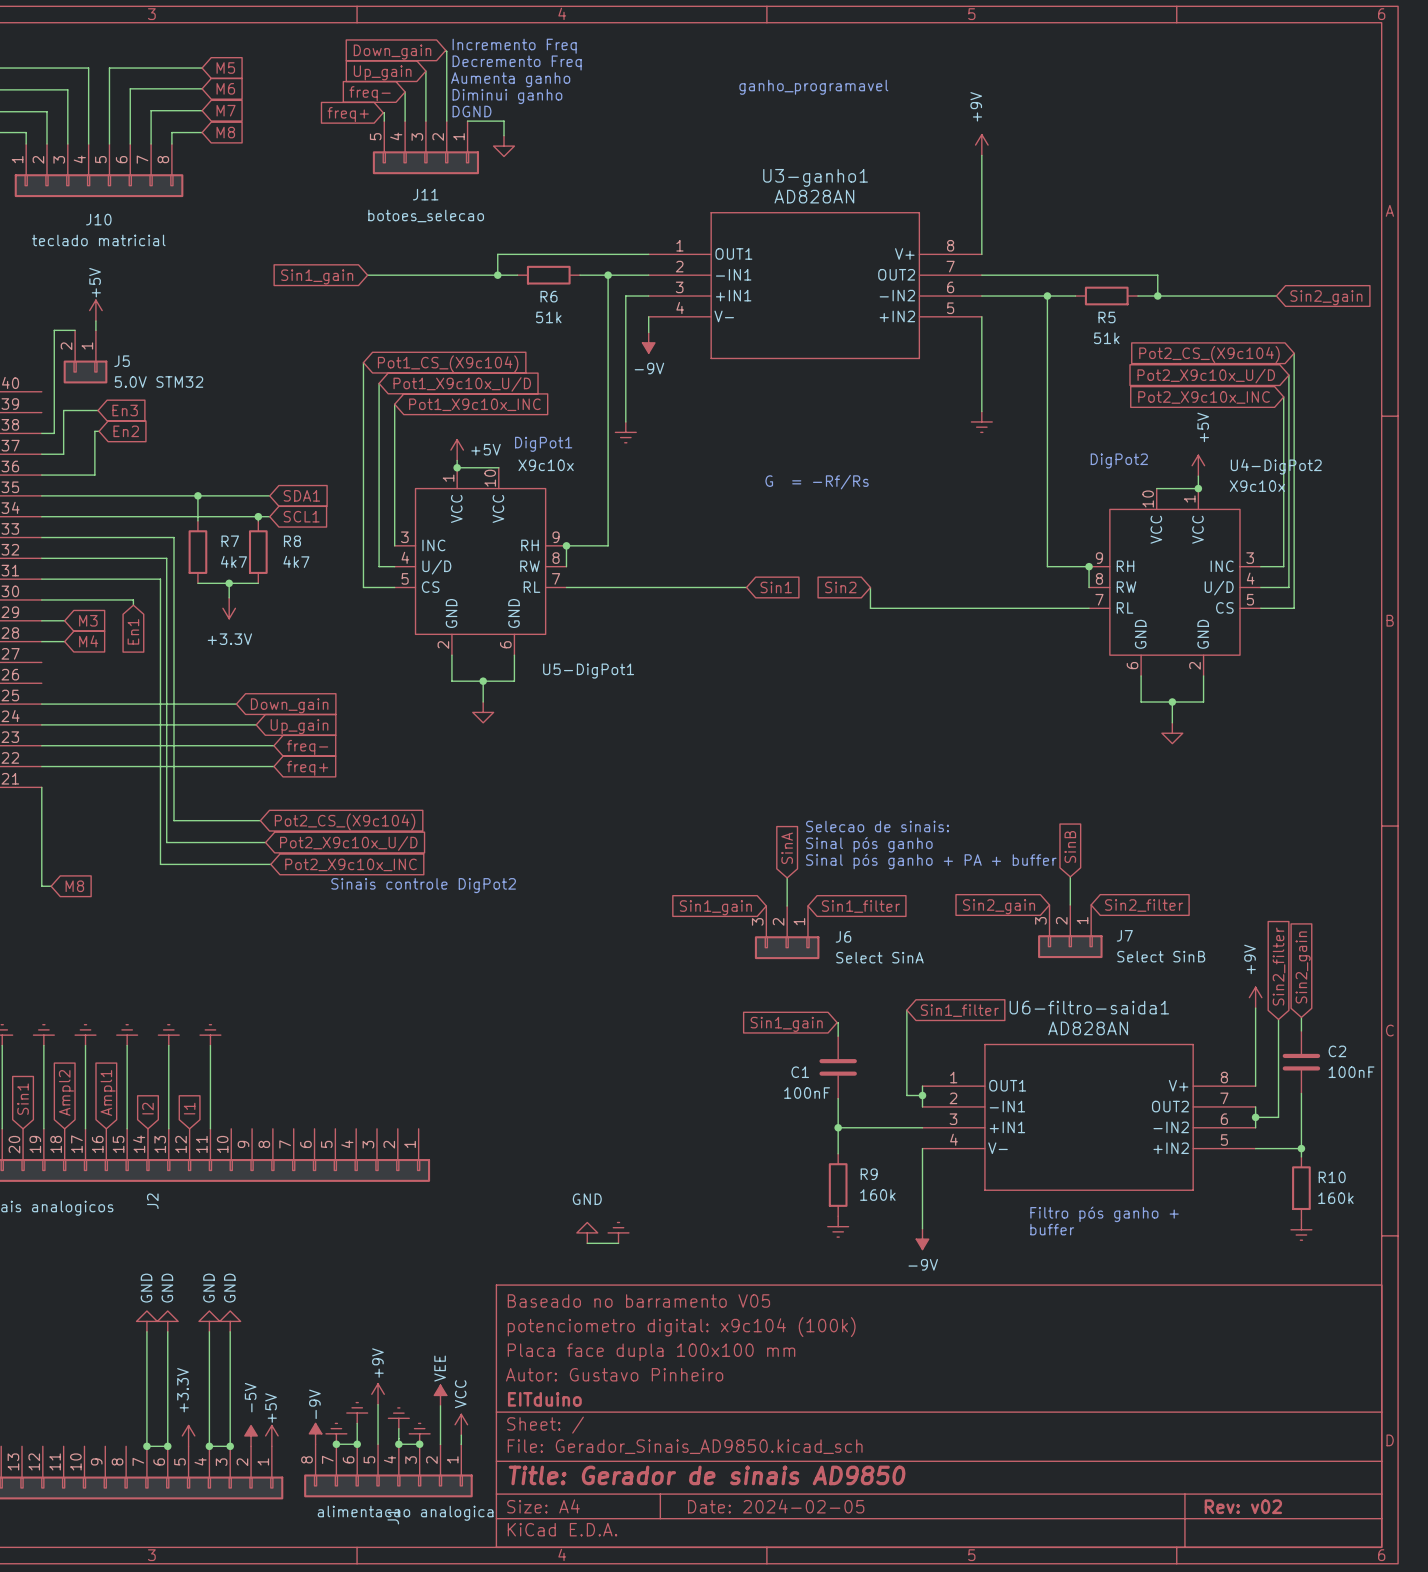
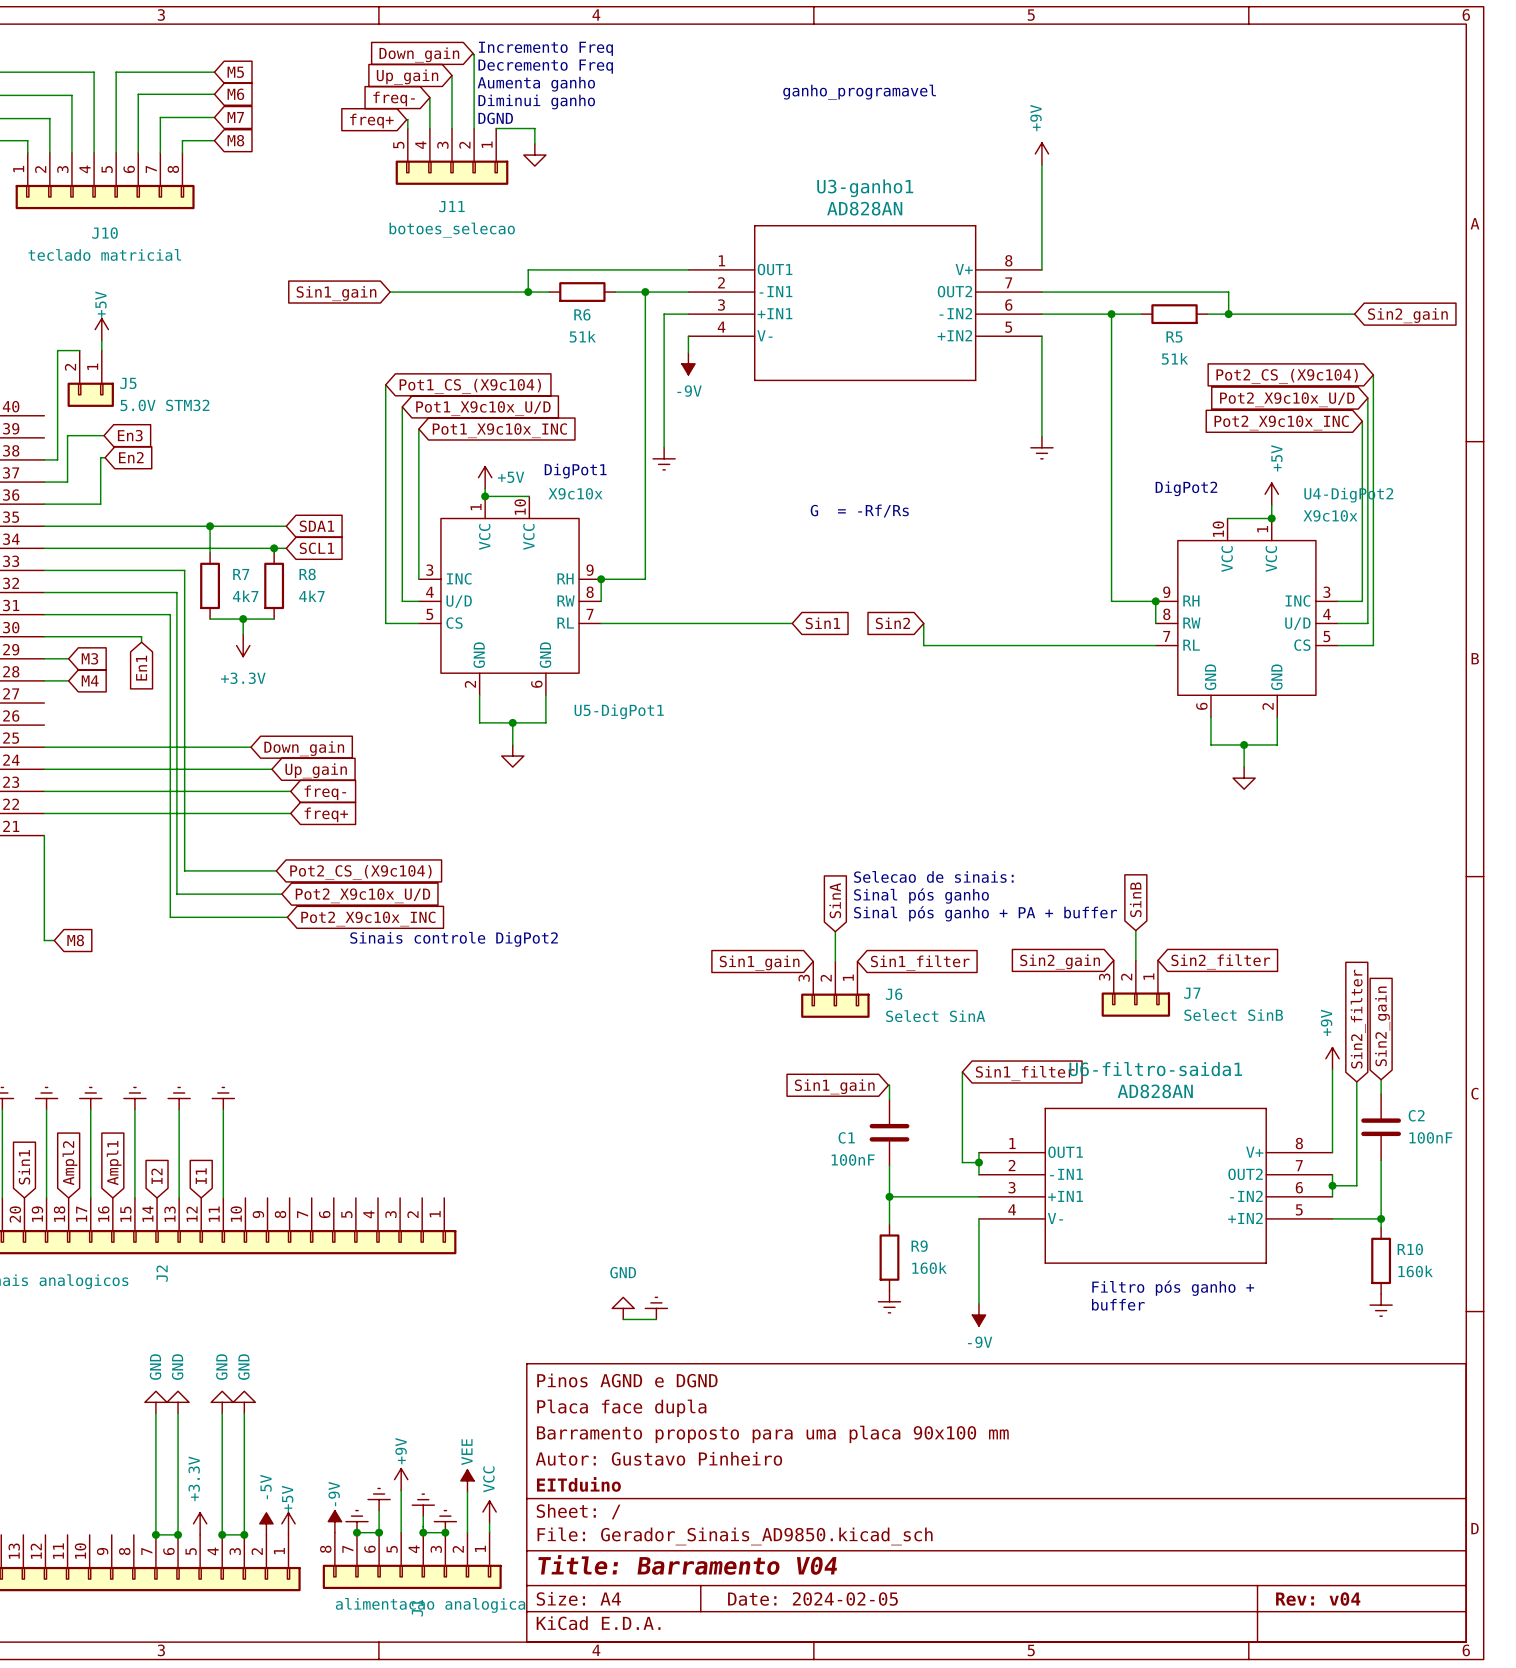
title block: Baseado no barramento V05 (638, 1300) -> Pinos AGND e DGND (627, 1380)
title block: potenciometro digital: x9c104 (100k) (681, 1327) -> Placa face dupla (621, 1408)
title block: Placa face dupla 100x100 mm (651, 1352) -> Barramento proposto para uma placa 90x100 mm (772, 1434)
title block: Title: Gerador de sinais AD9850 (707, 1475) -> Title: Barramento V04 (687, 1564)
title block: Rev: v02 (1243, 1506) -> Rev: v04 (1318, 1599)

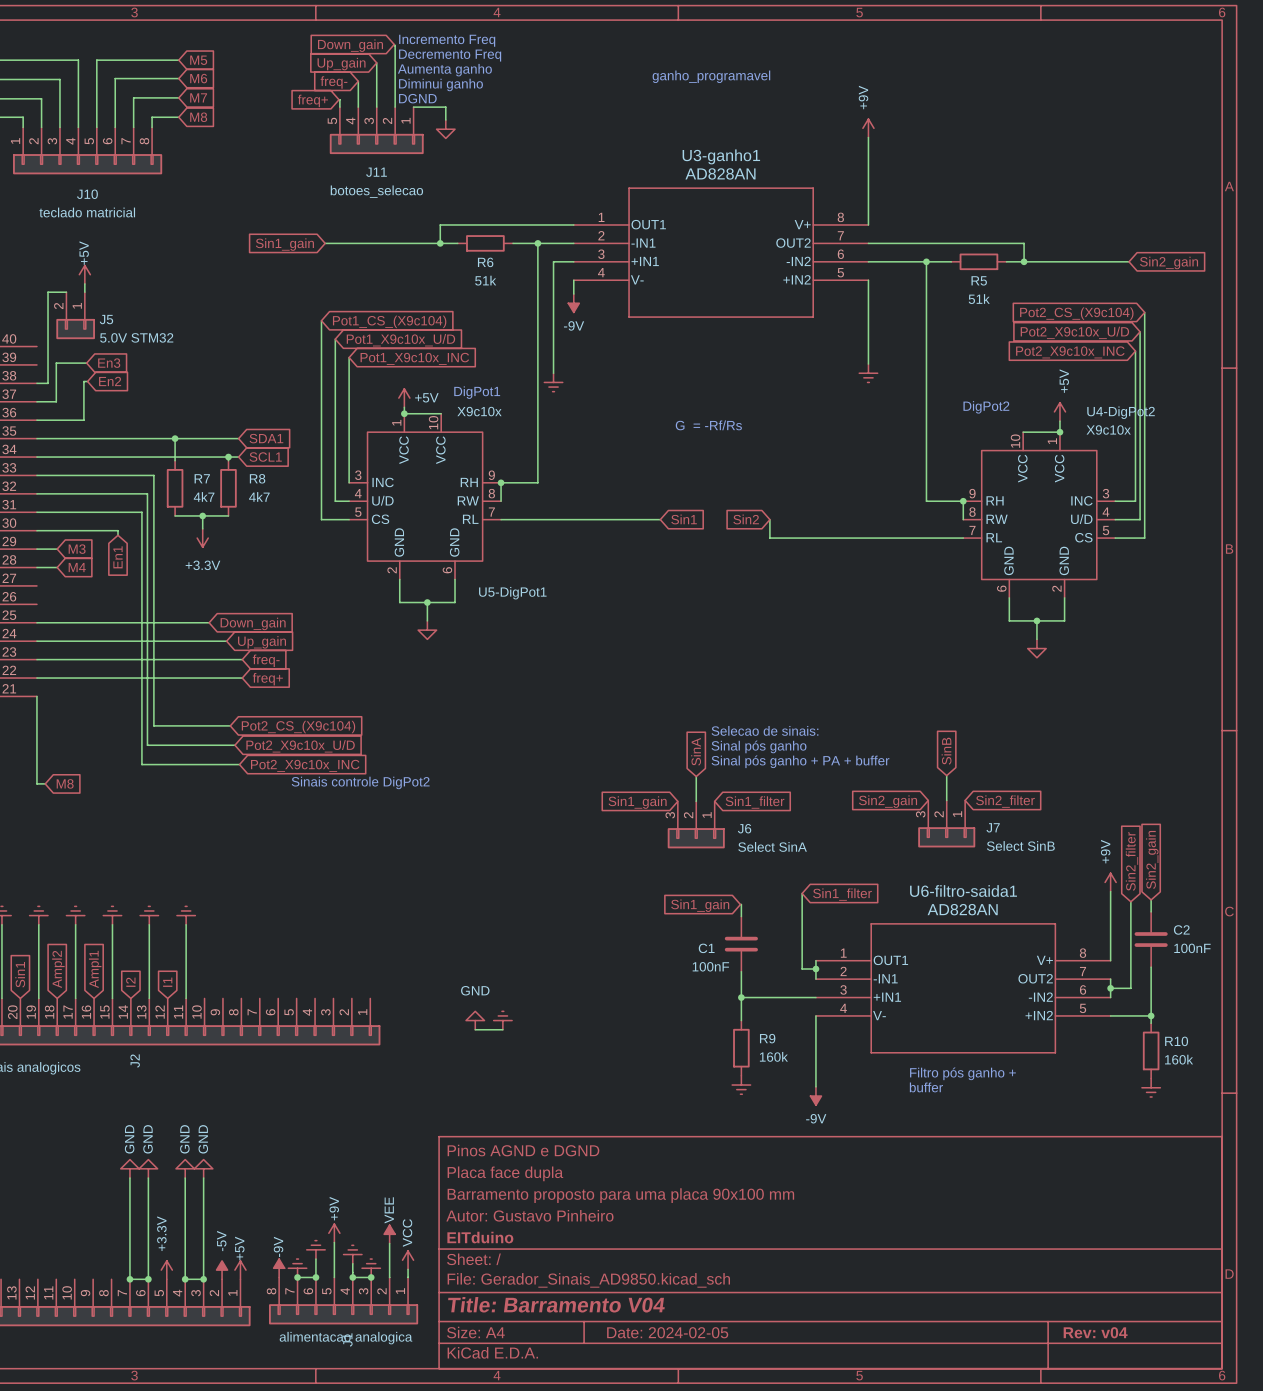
power symbol position: GND (623, 1308) -> GND (475, 1020)
power symbol position: (656, 1308) -> (502, 1020)
wire: (623, 1319) (656, 1319) -> (475, 1029) (502, 1029)

